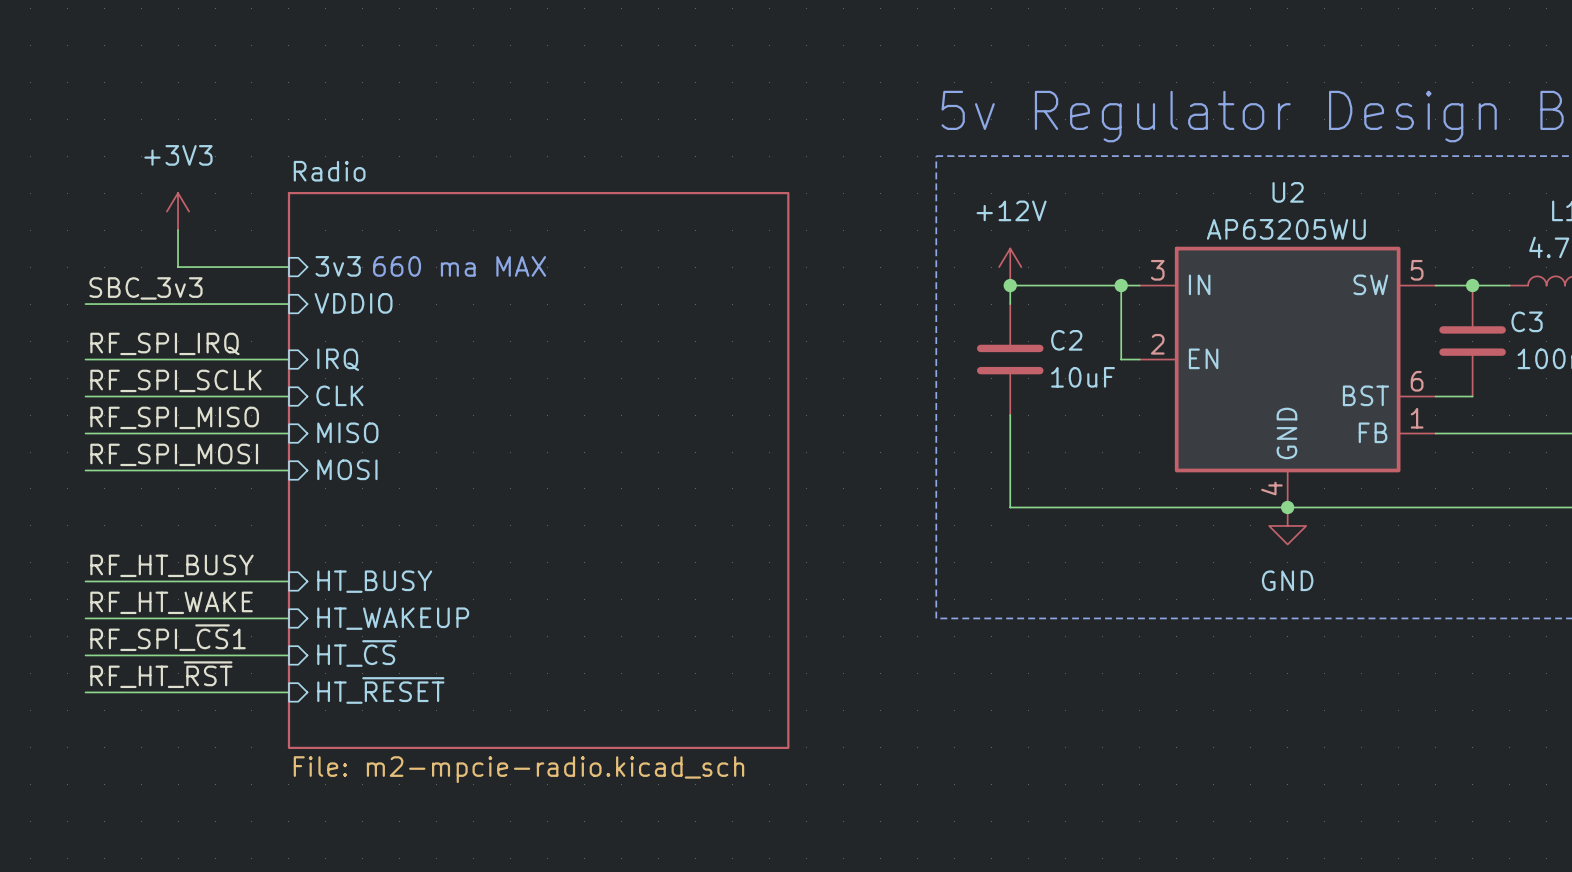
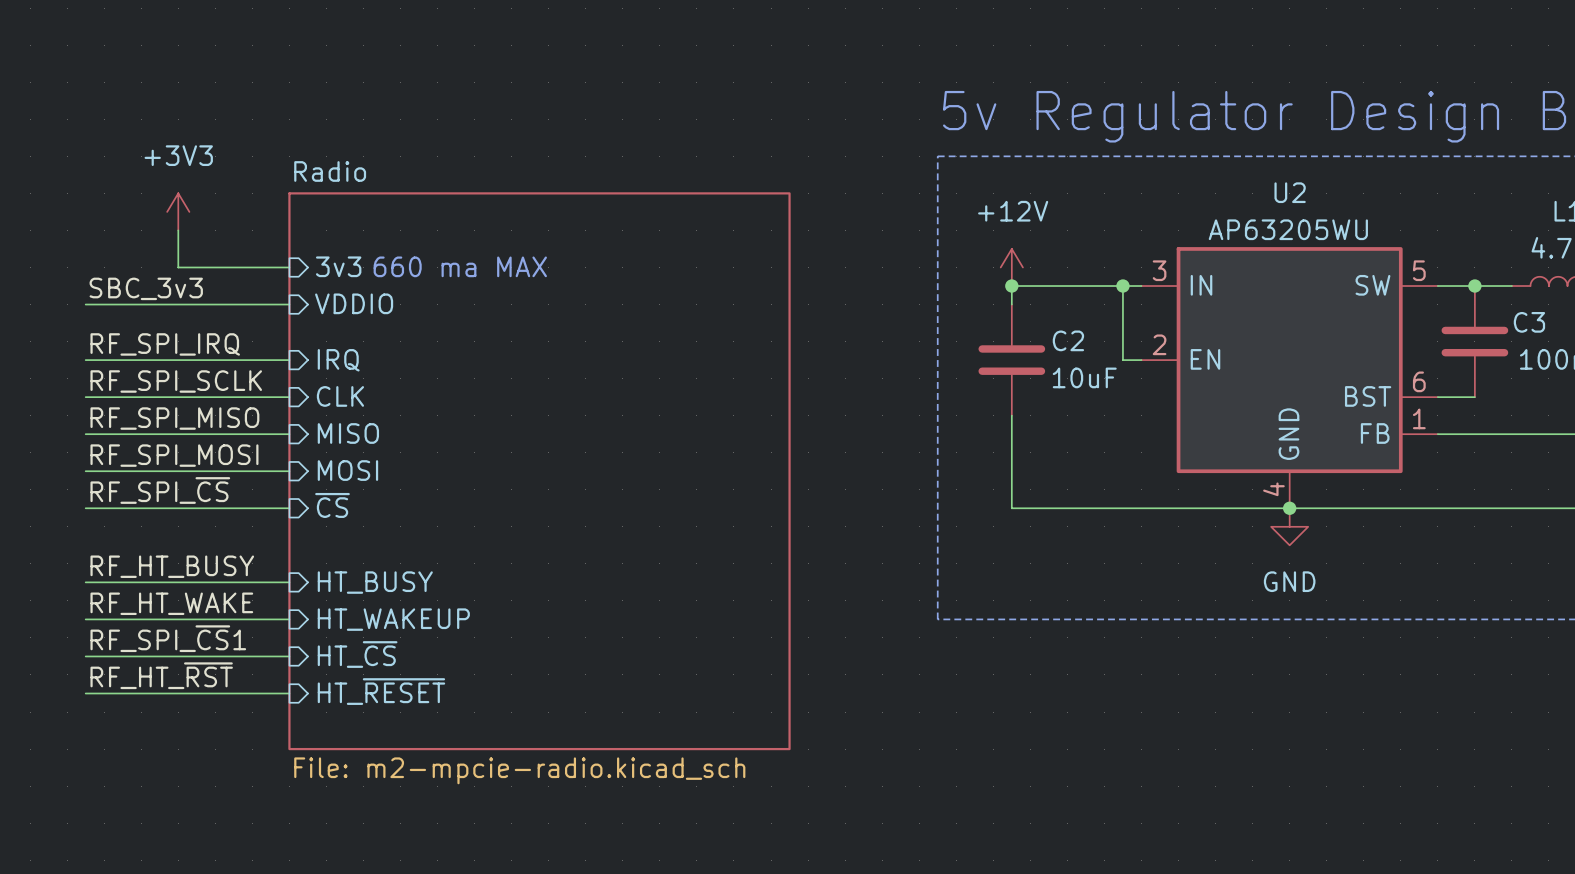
label: none -> RF_SPI_~{CS} (160, 490)
sheet pin: none -> ~{CS} (332, 505)
wire: none -> (85, 508) (289, 508)

